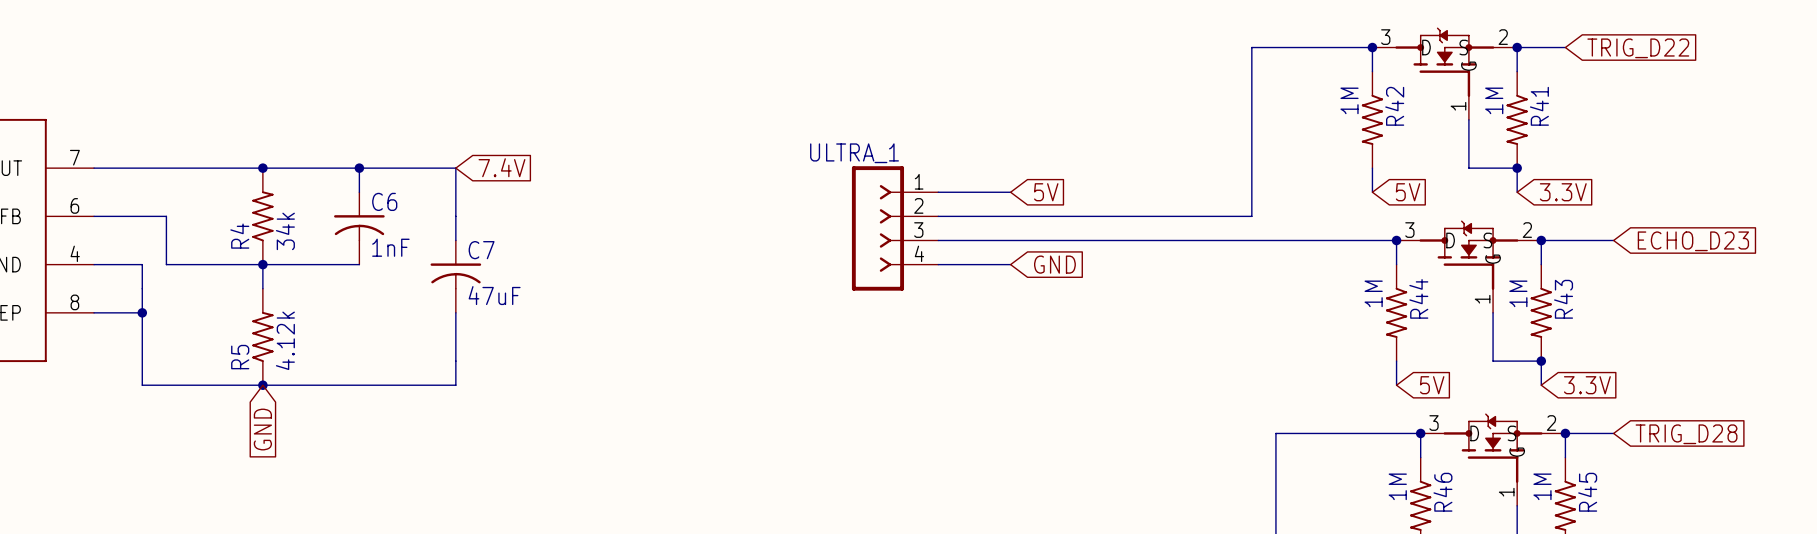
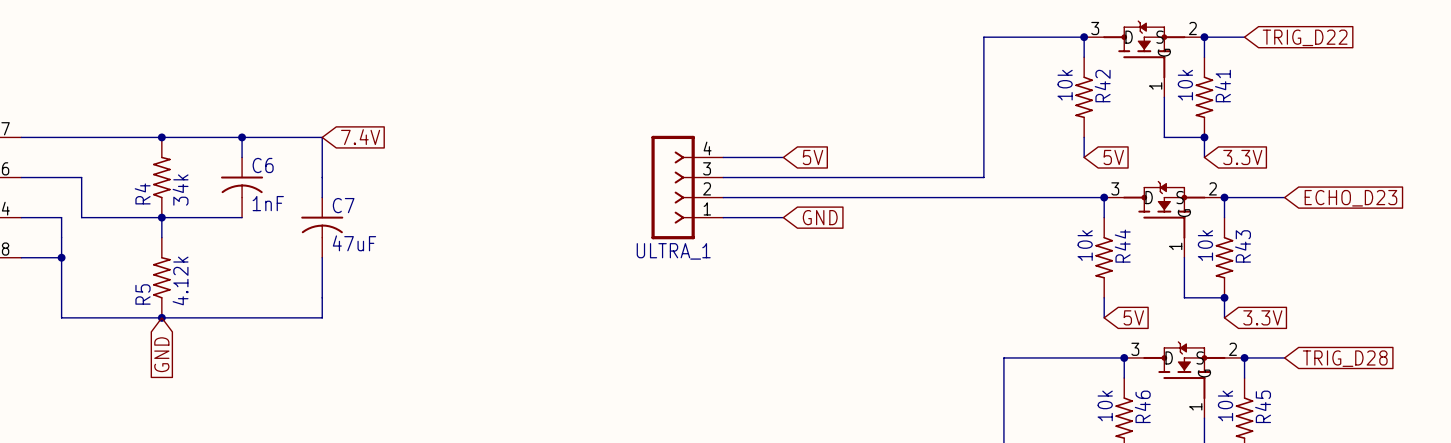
R42 value: 1M (1349, 100) -> 10k (1065, 85)
R41 value: 1M (1494, 100) -> 10k (1185, 85)
ULTRA_1 name position: ULTRA_1 (854, 153) -> ULTRA_1 (673, 251)
ULTRA_1 flip: as is (877, 228) -> up-down (673, 187)
R44 value: 1M (1373, 293) -> 10k (1085, 245)
R43 value: 1M (1518, 293) -> 10k (1205, 245)
R46 value: 1M (1397, 486) -> 10k (1105, 405)
R45 value: 1M (1542, 486) -> 10k (1225, 405)

